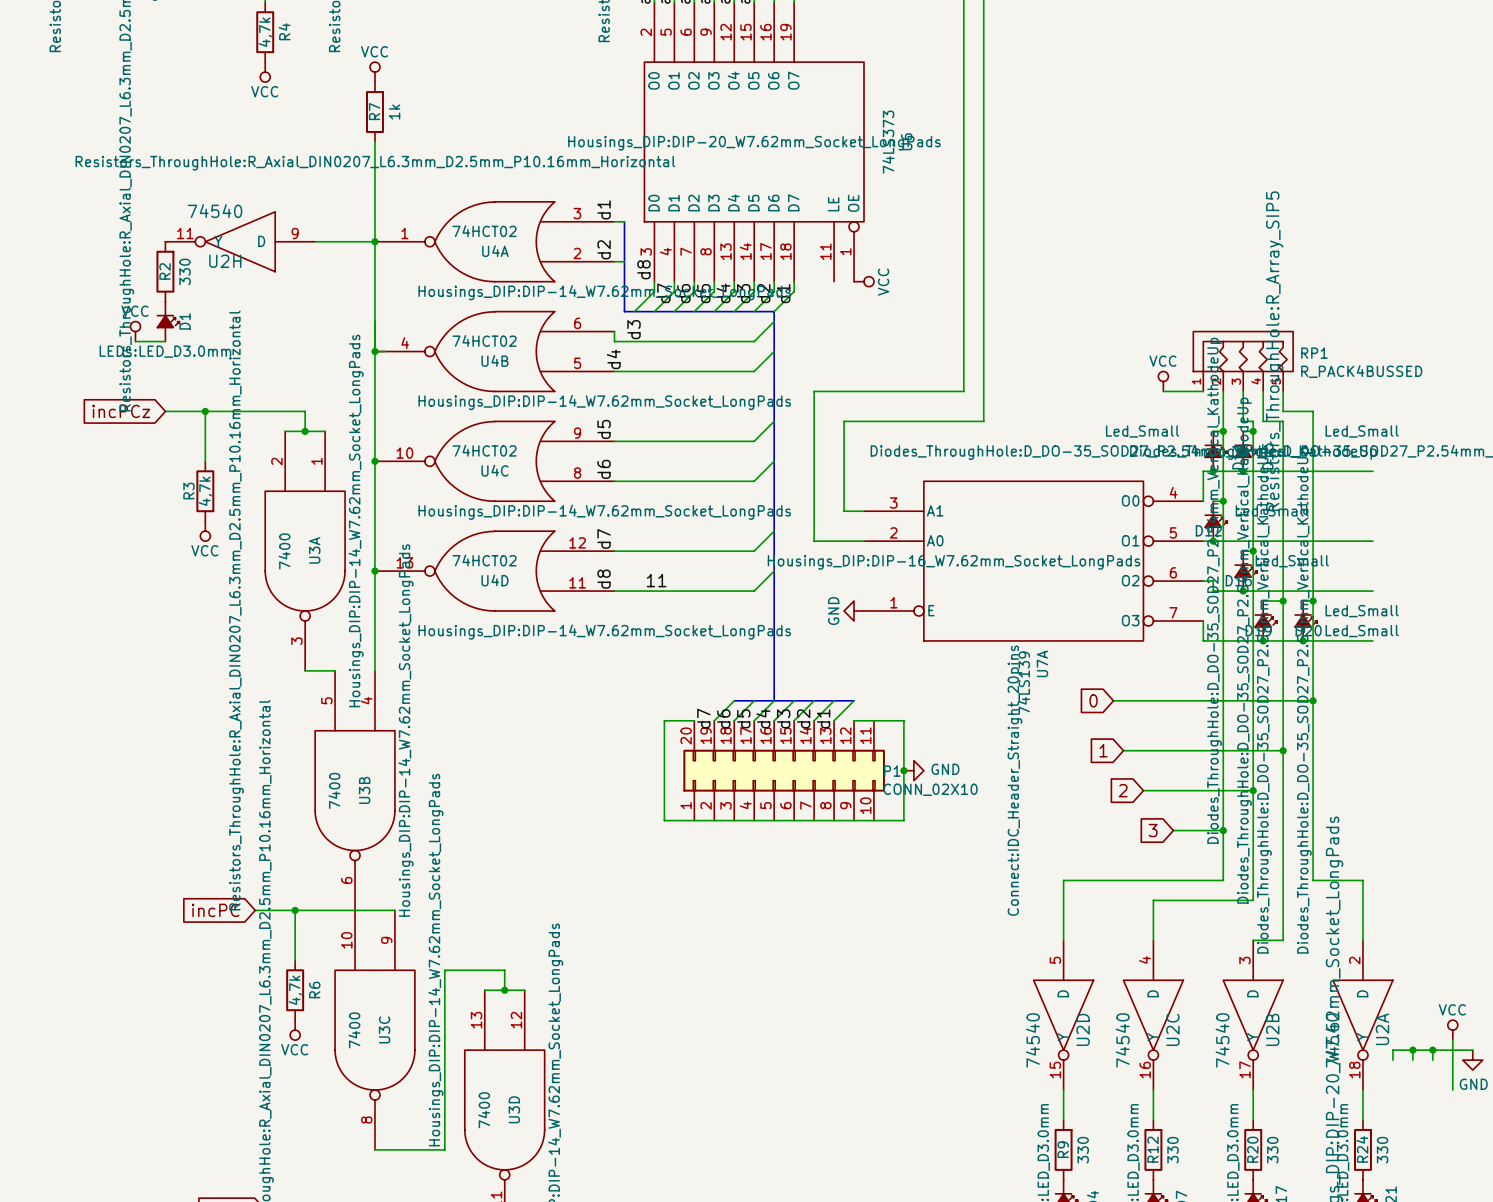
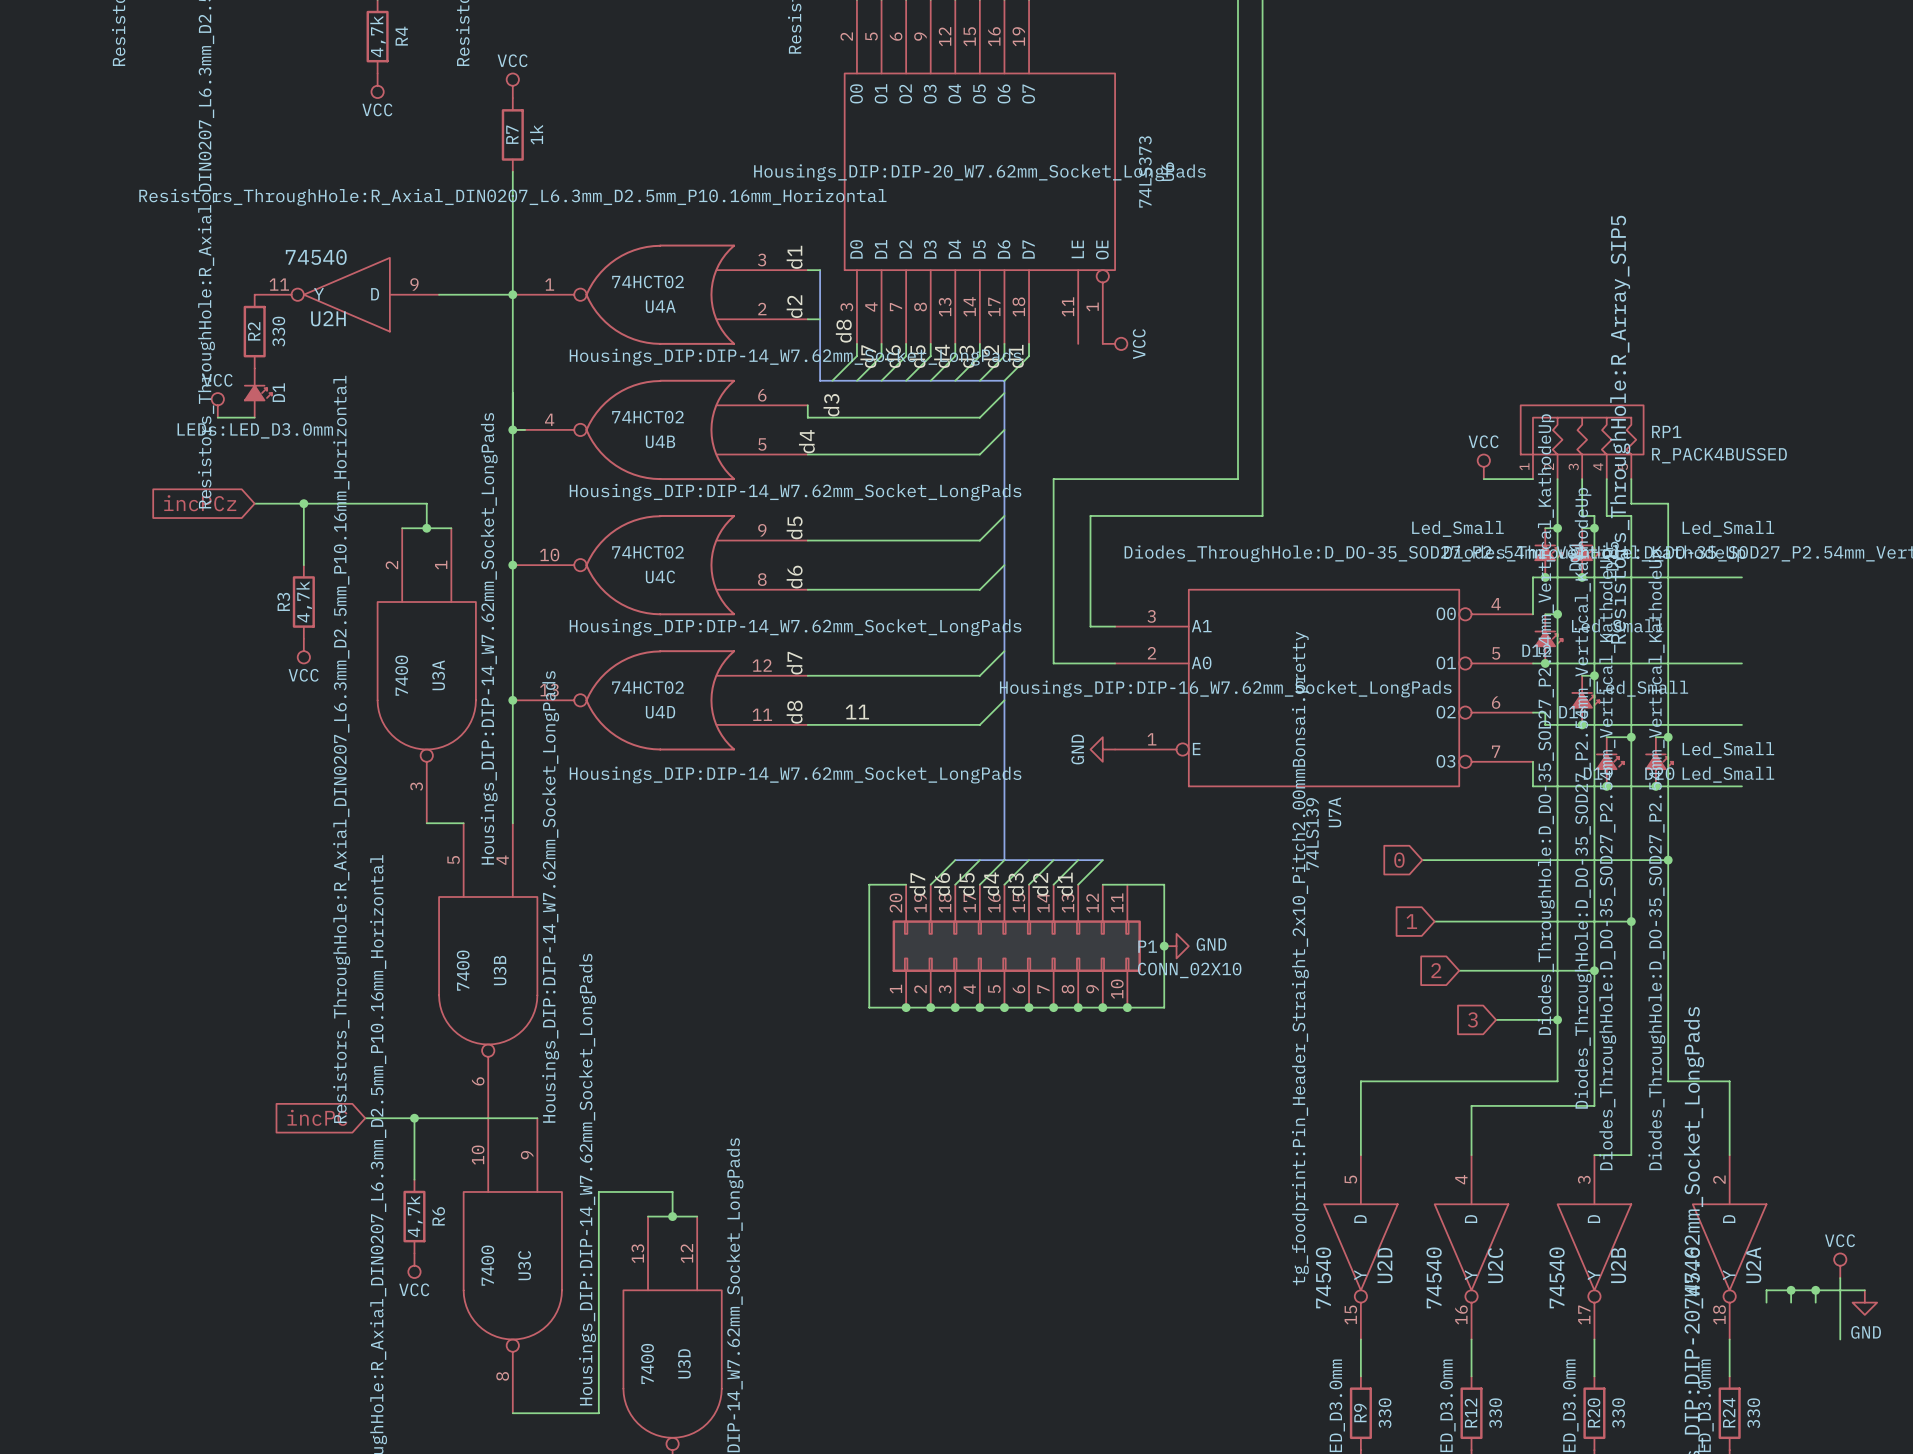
P1 text: Connect:IDC_Header_Straight_20pins (1014, 780) -> tg_foodprint:Pin_Header_Straight_2x10_Pitch2.00mmBonsai.pretty (1300, 958)
junction: none -> (906, 1007)
junction: none -> (930, 1007)
junction: none -> (955, 1007)
junction: none -> (979, 1007)
junction: none -> (1004, 1007)
junction: none -> (1029, 1007)
junction: none -> (1053, 1007)
junction: none -> (1078, 1007)
junction: none -> (1102, 1007)
junction: none -> (1127, 1007)

